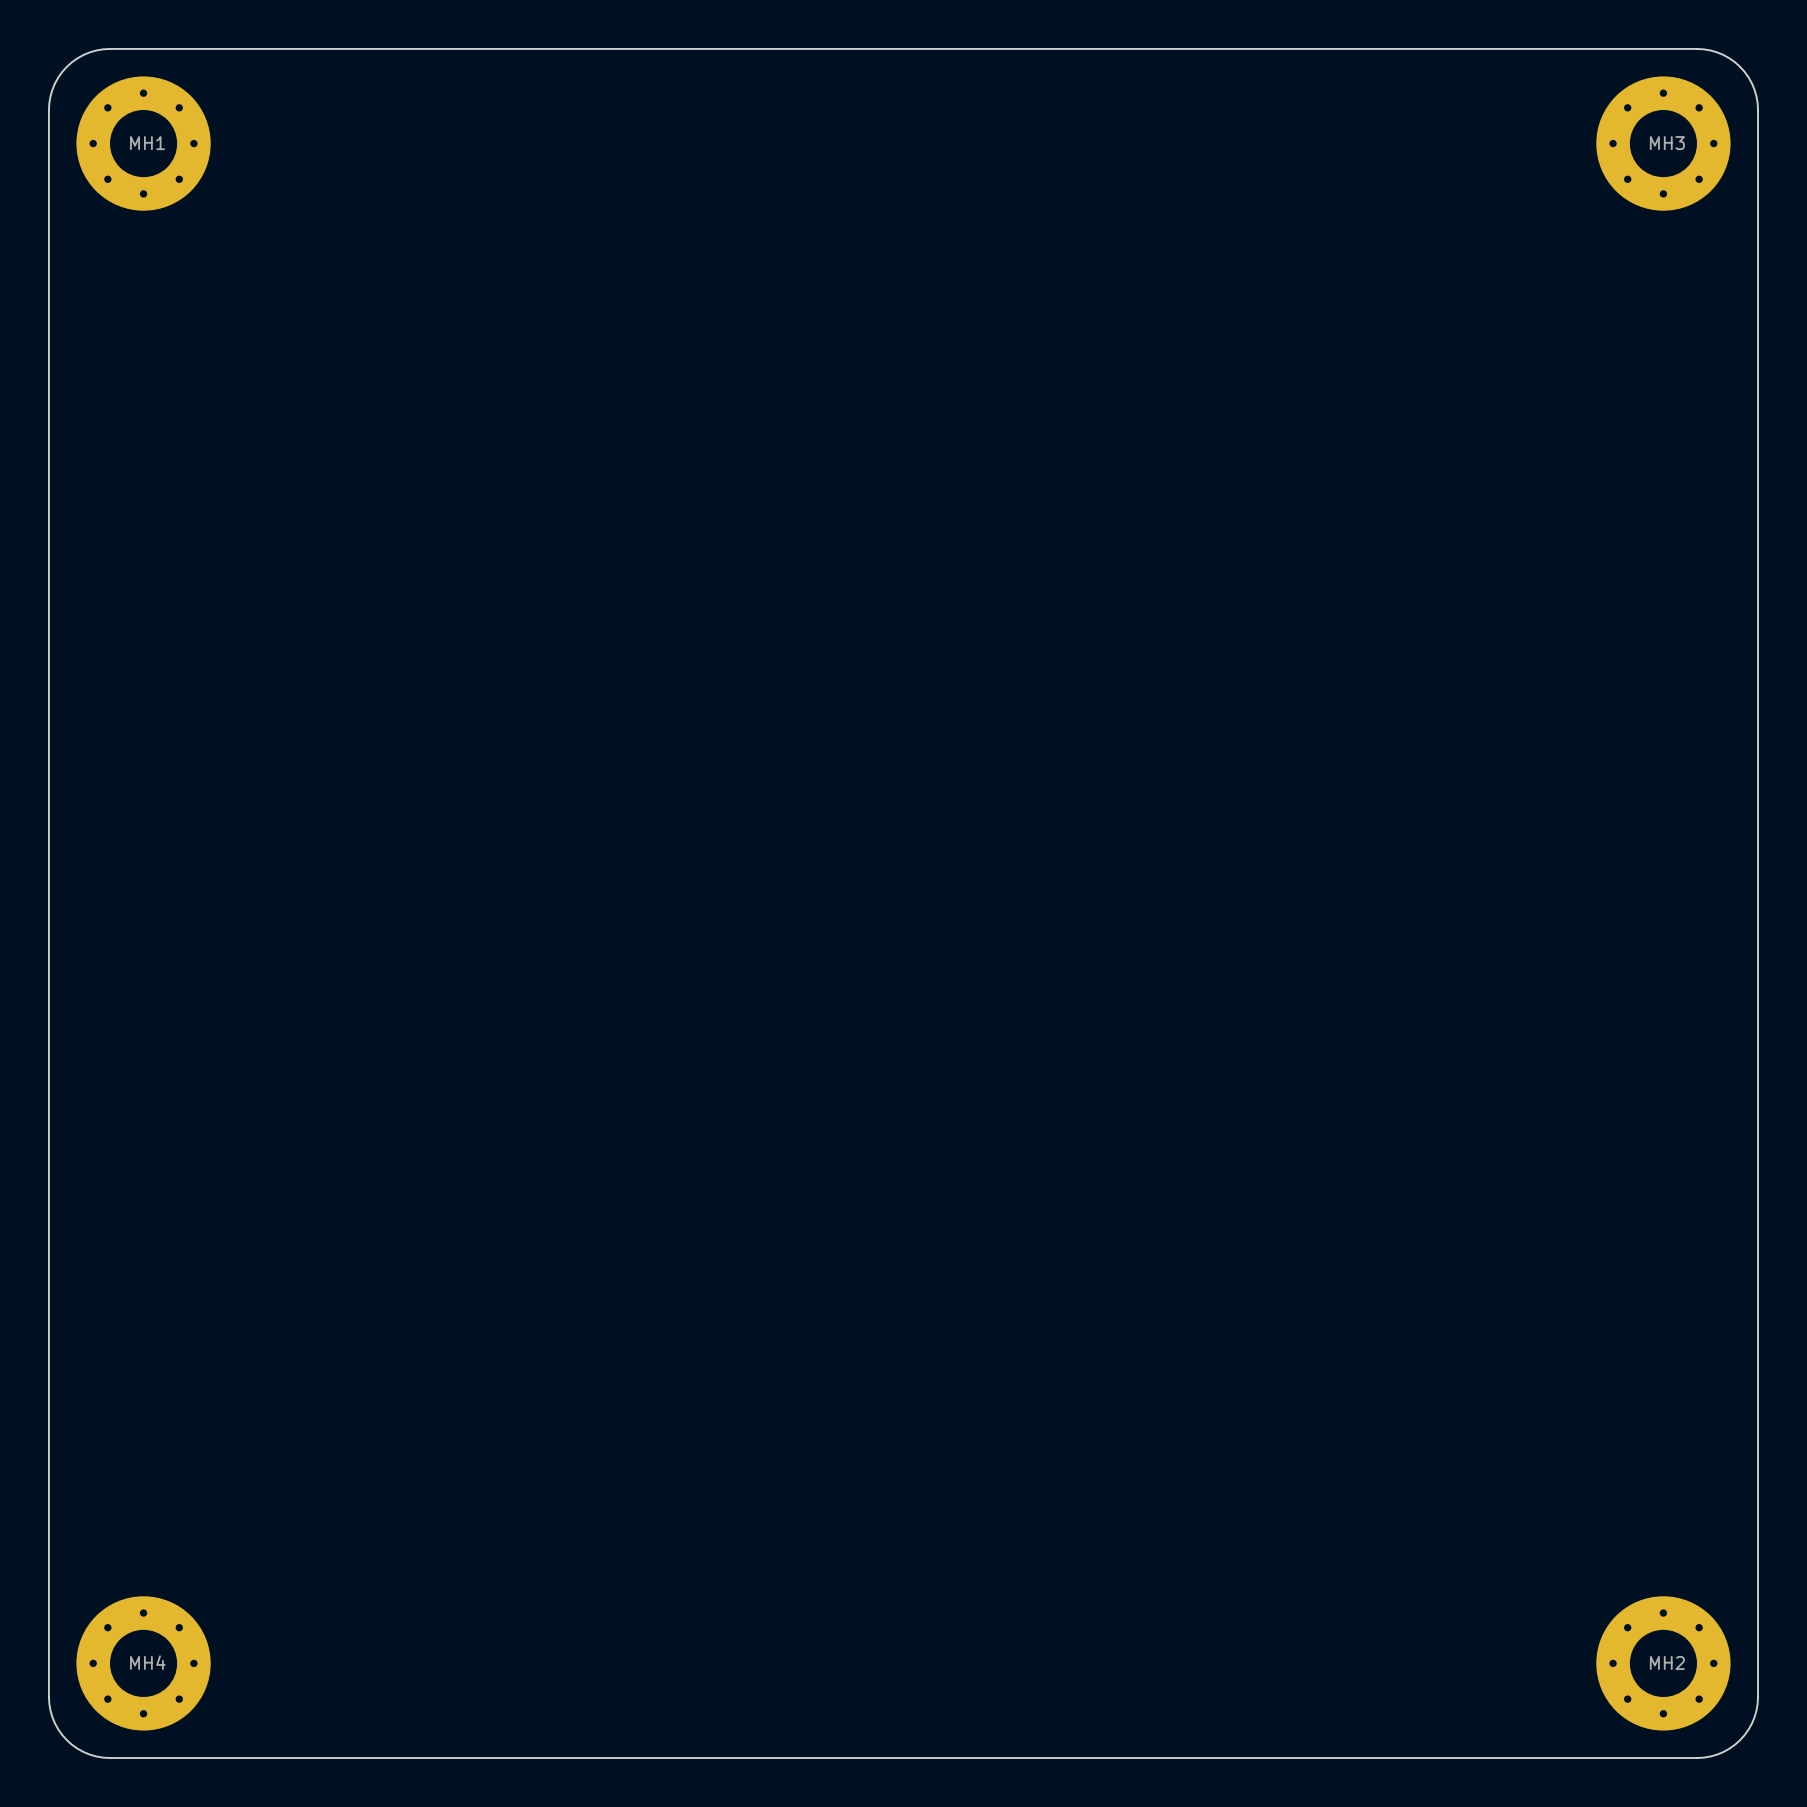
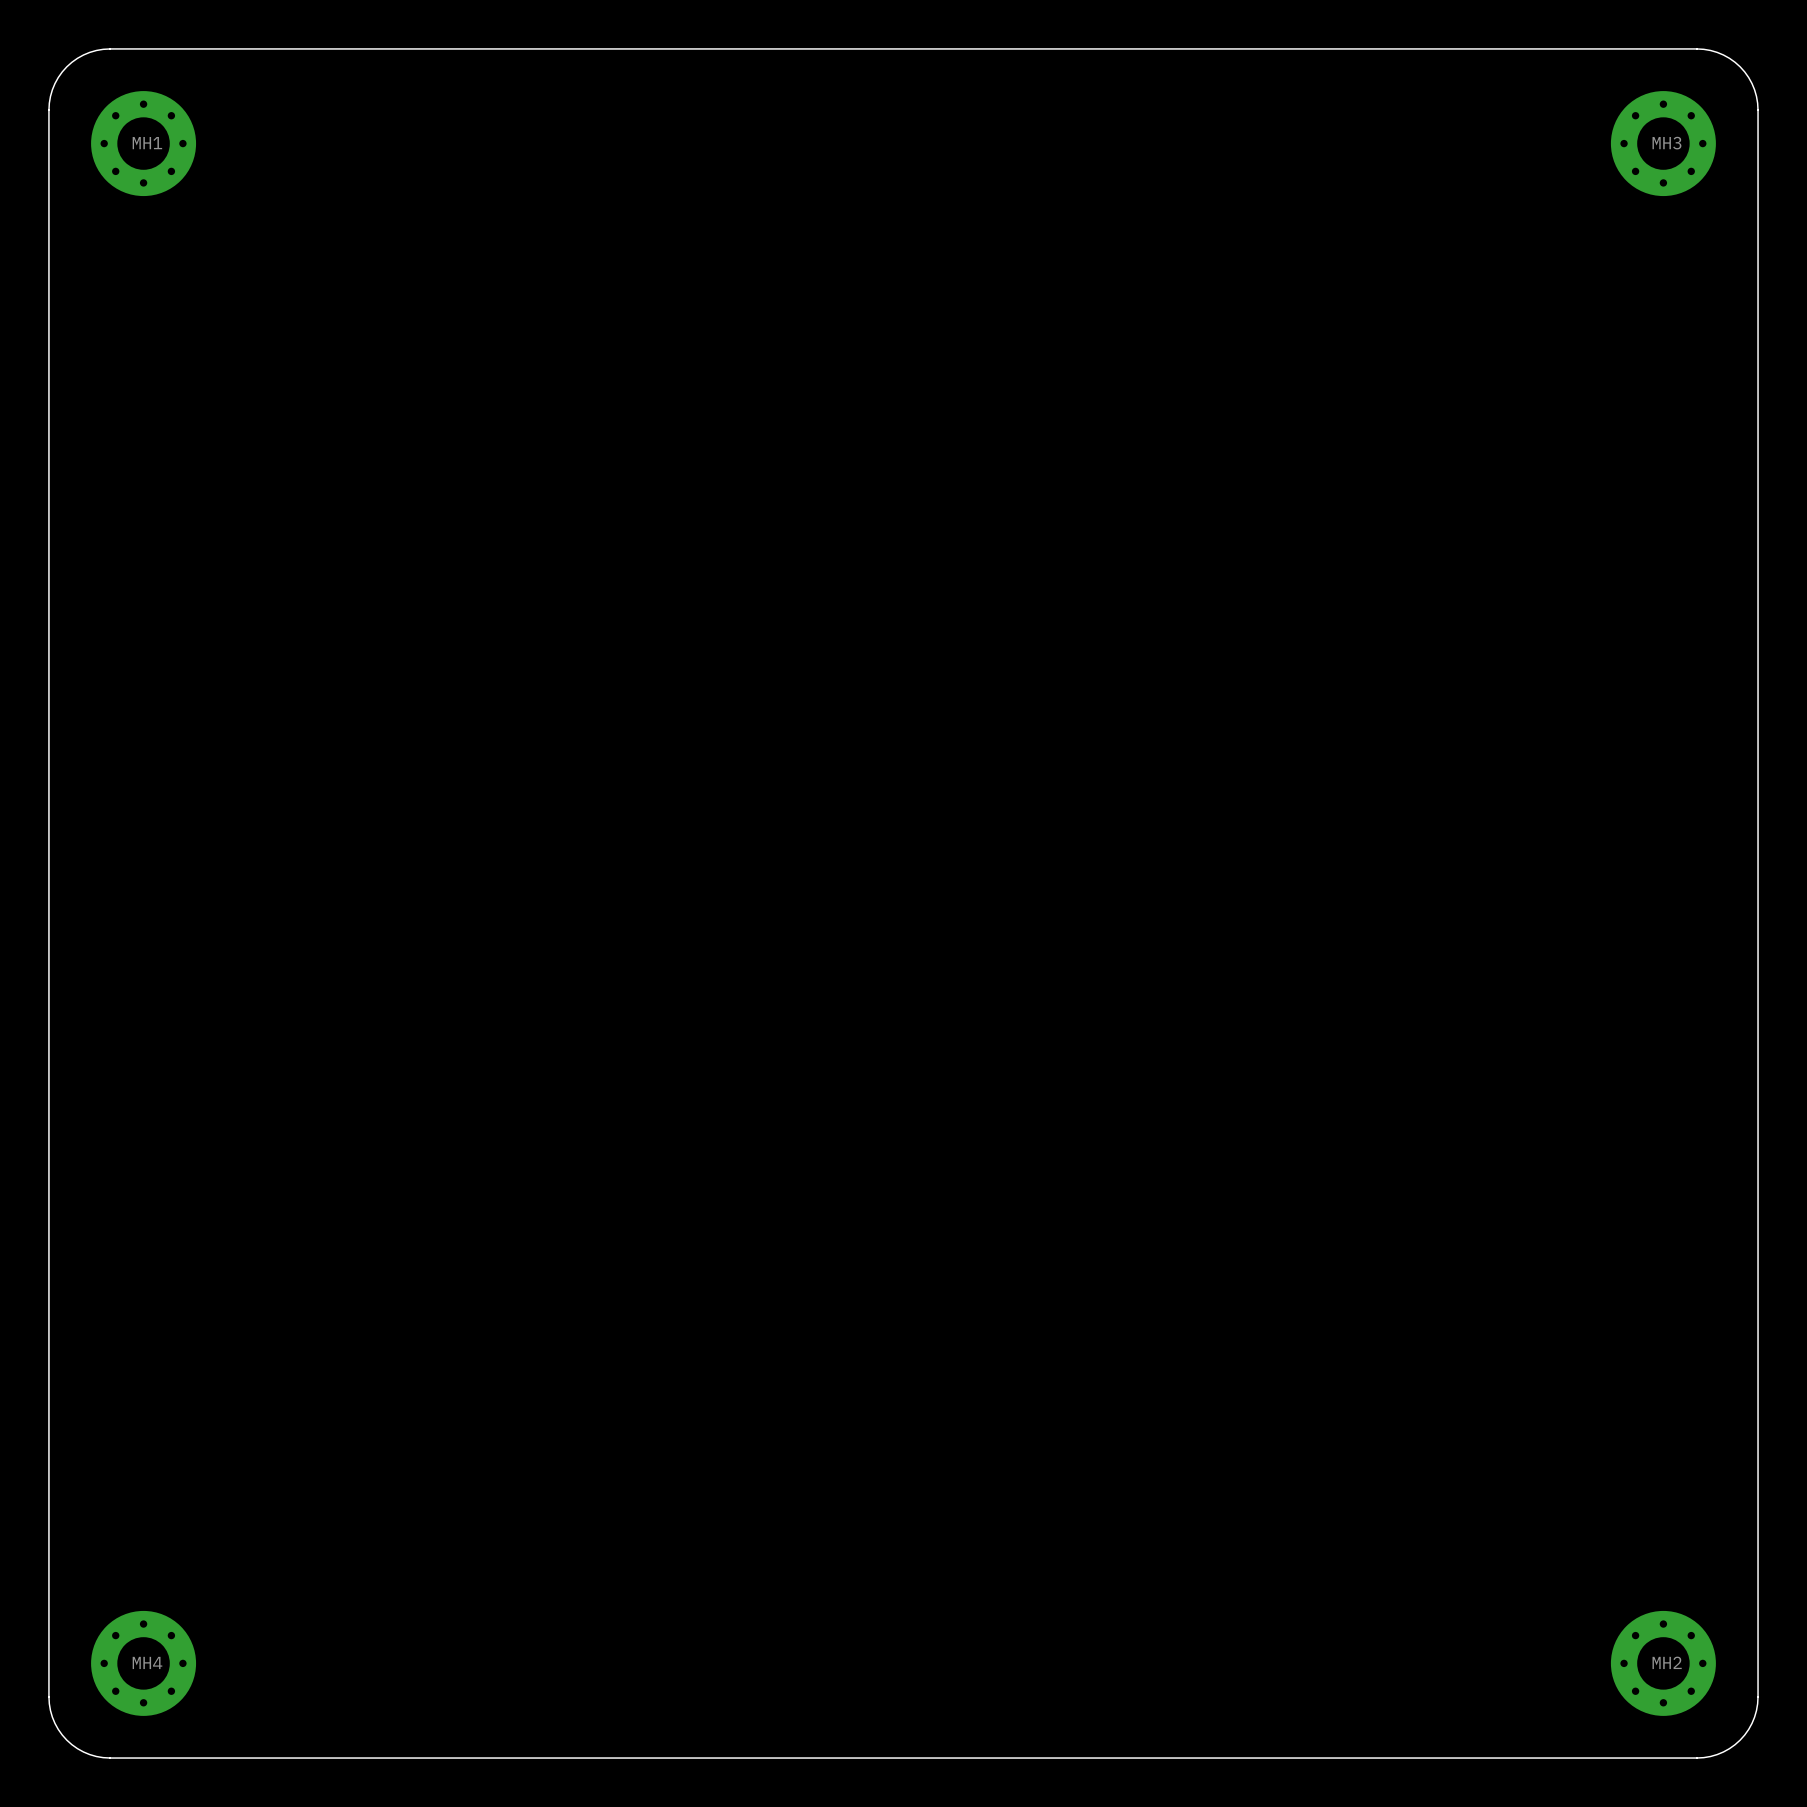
MH1 footprint: [76, 76, 211, 211] -> [91, 91, 197, 197]
MH3 footprint: [1596, 76, 1731, 211] -> [1610, 91, 1716, 197]
MH4 footprint: [76, 1596, 211, 1731] -> [91, 1610, 197, 1716]
MH2 footprint: [1596, 1596, 1731, 1731] -> [1610, 1610, 1716, 1716]

